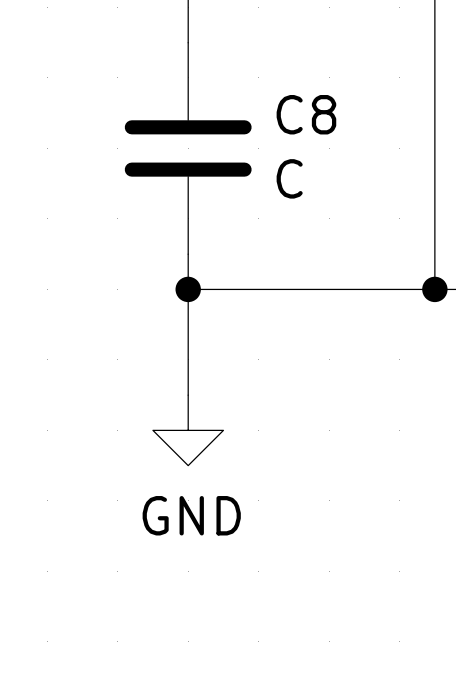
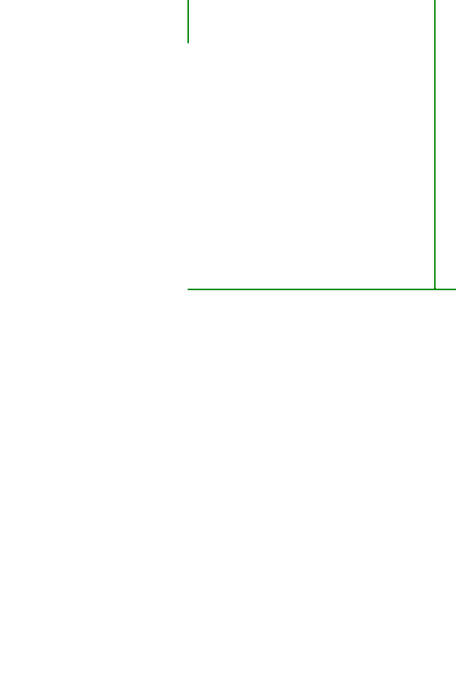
C8: C (188, 148) -> none
wire: (188, 254) (188, 395) -> none
junction: (188, 289) -> none
junction: (434, 289) -> none
power symbol: GND (188, 430) -> none

